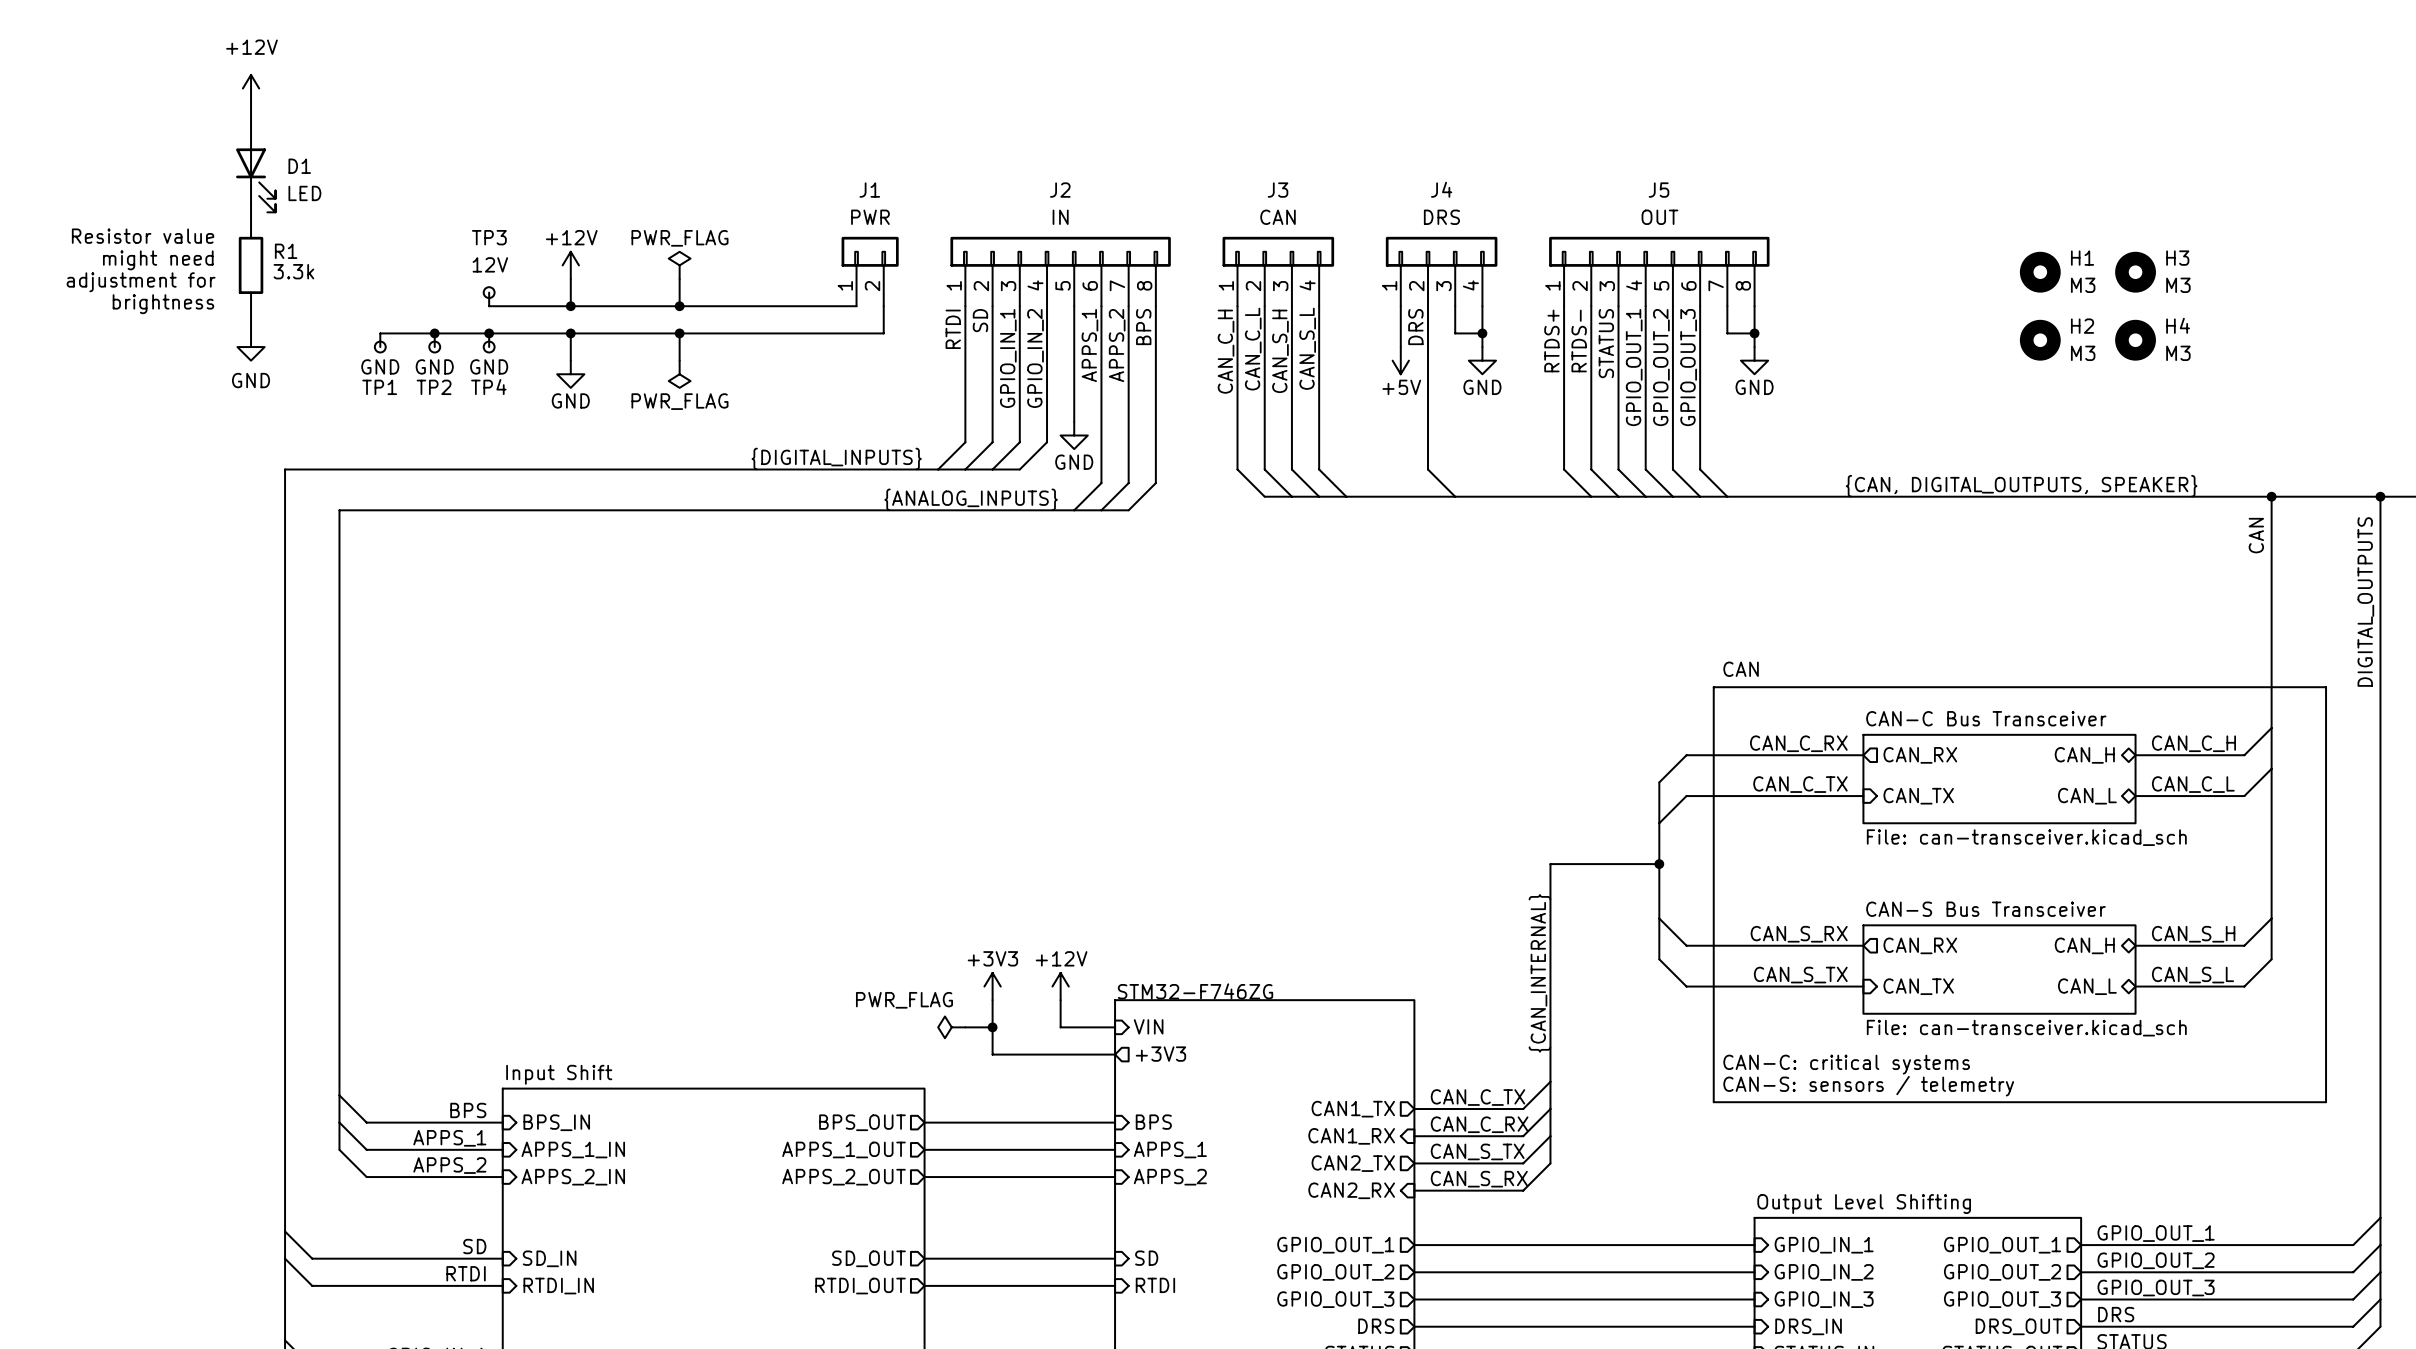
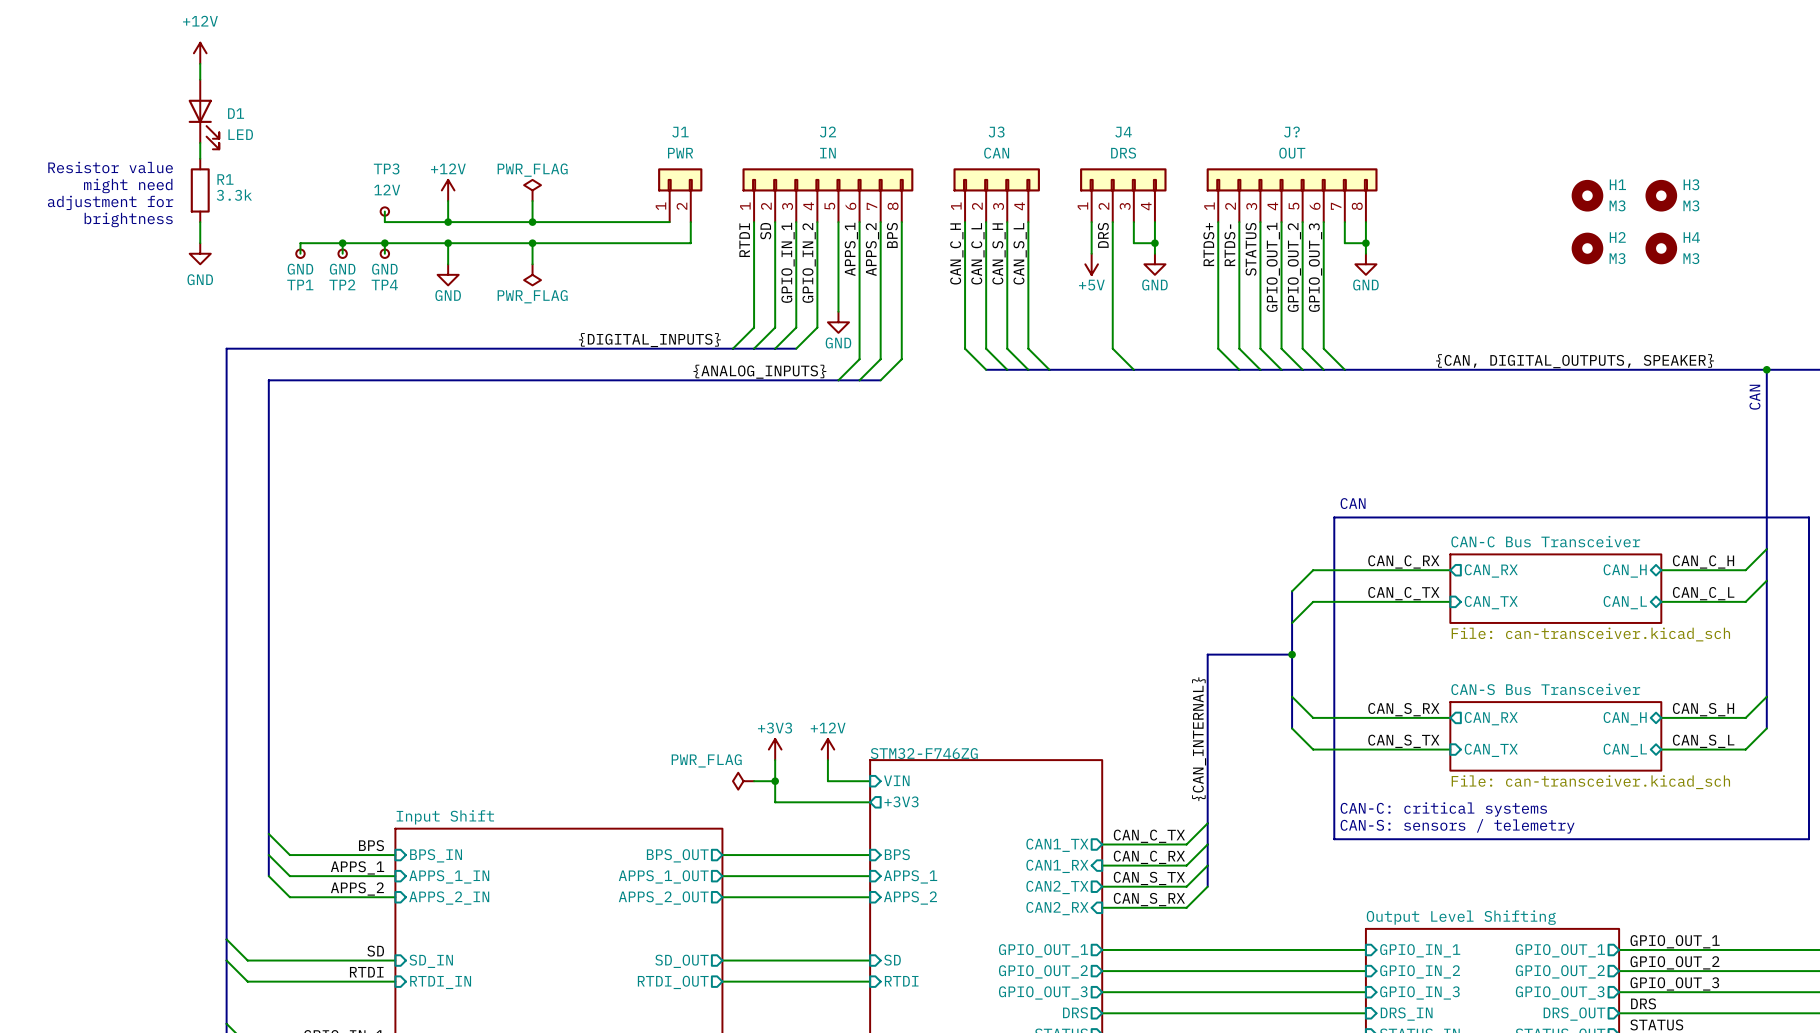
J5 name: J5 (1658, 190) -> J? (1291, 132)

